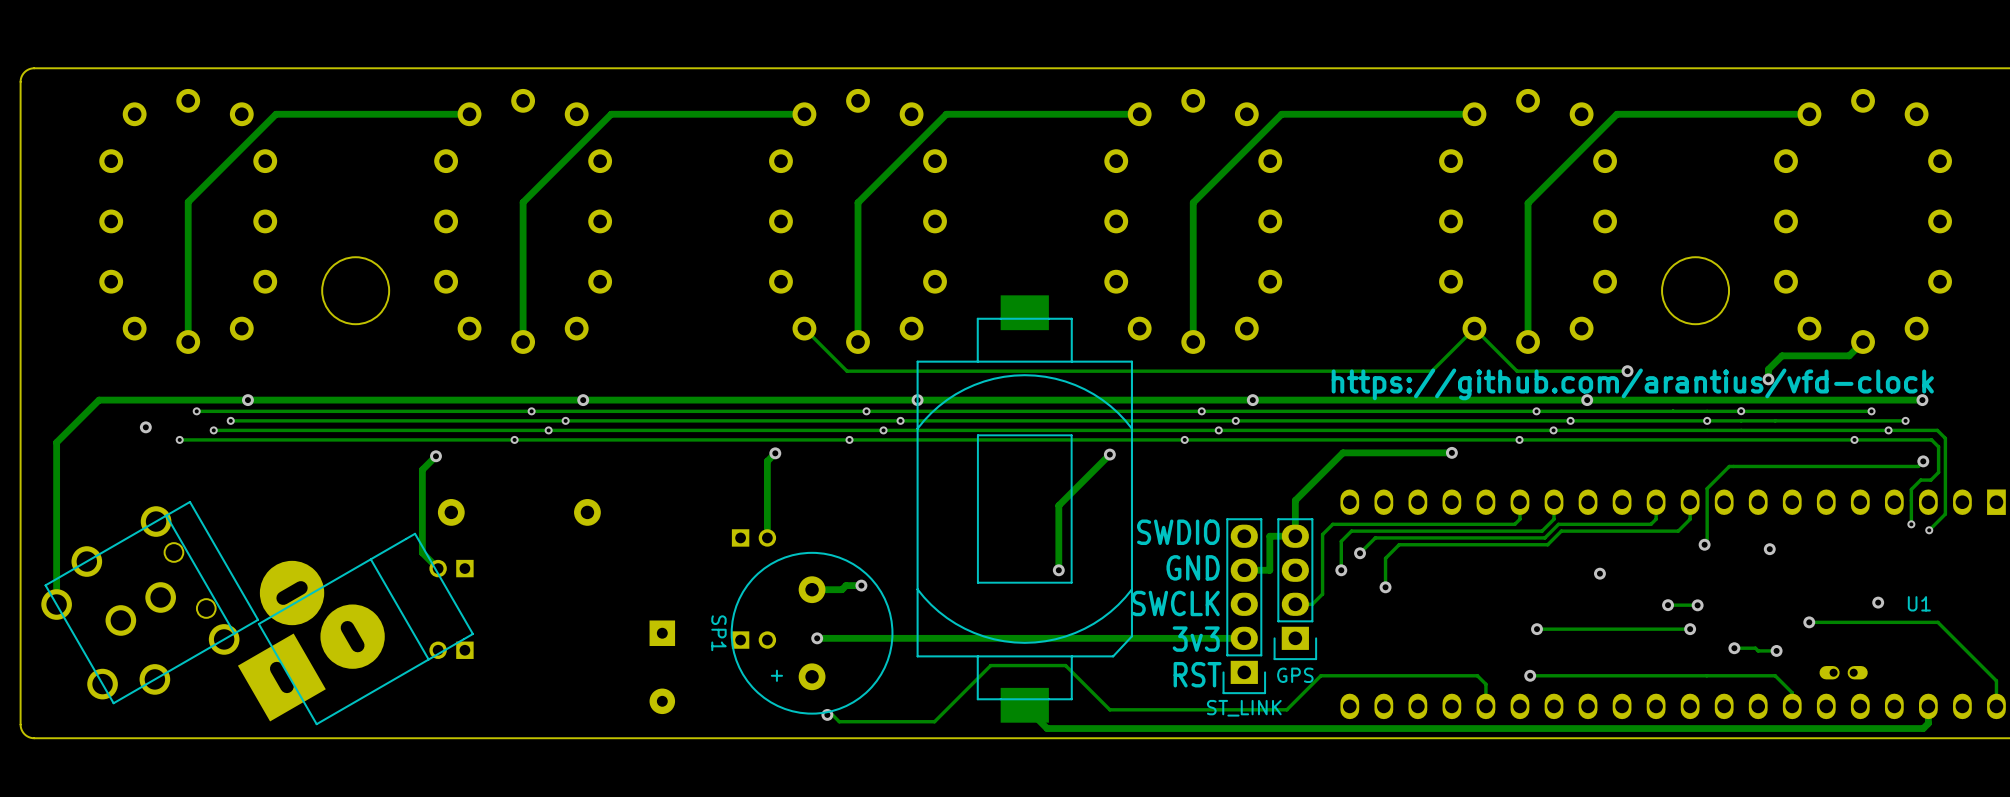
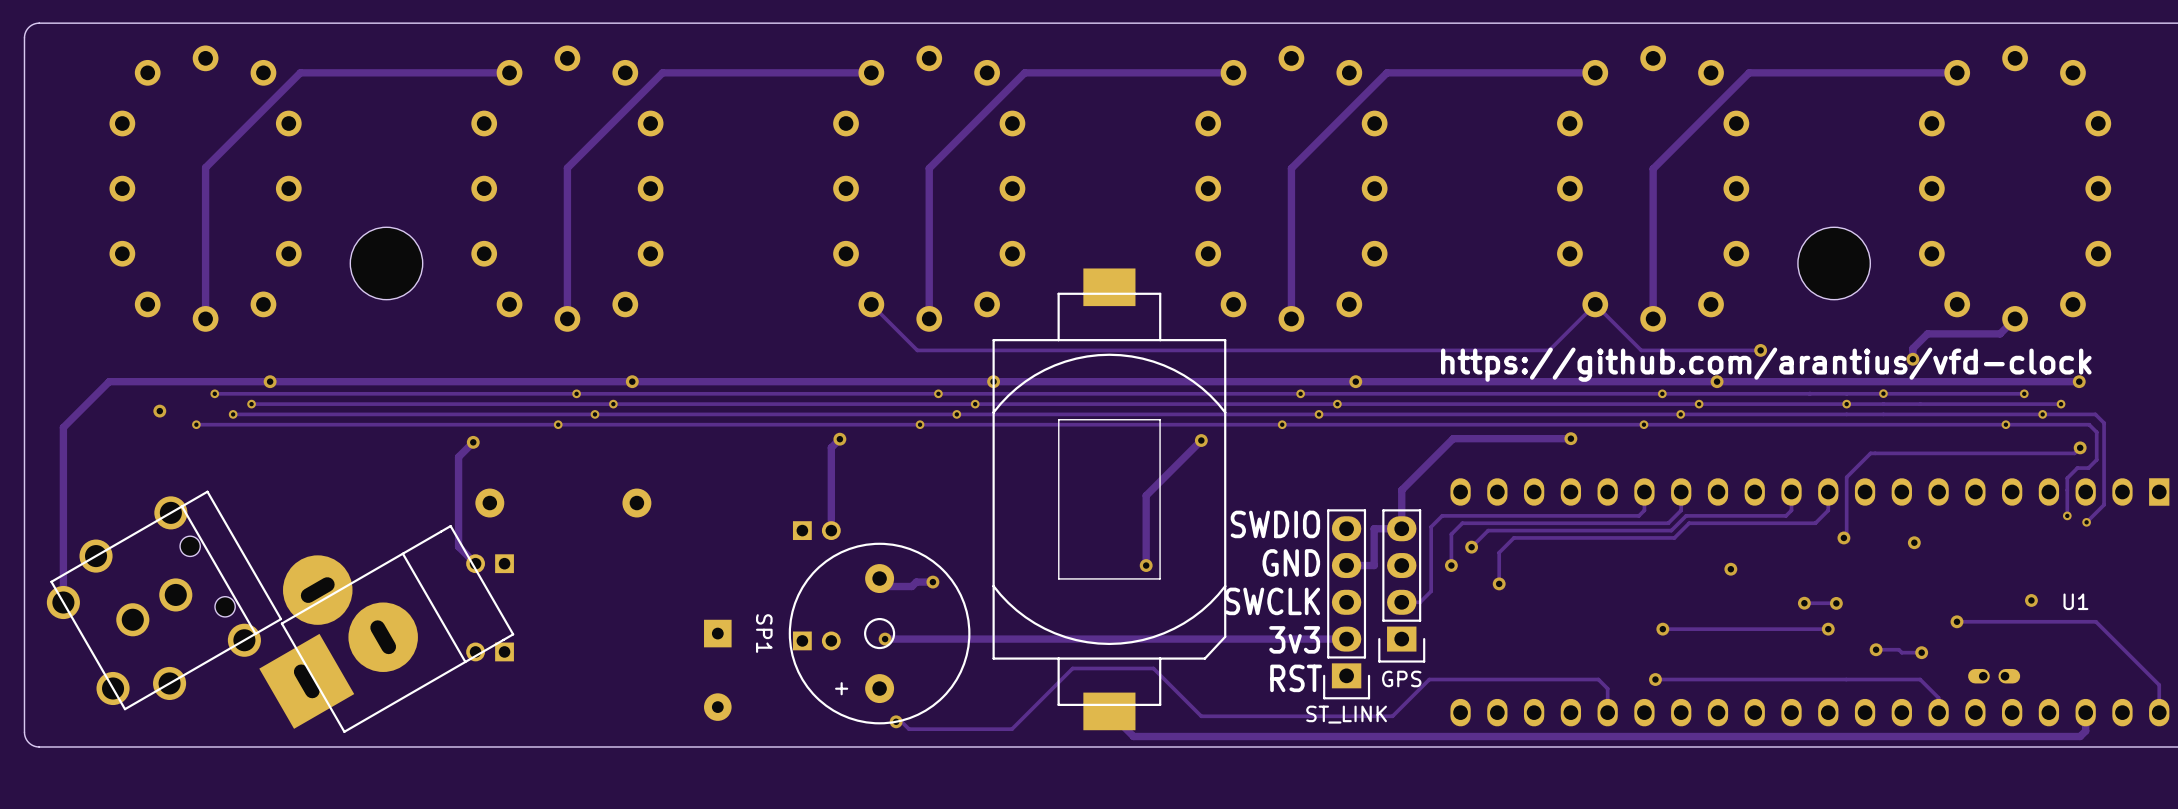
SP1 footprint: [730, 551, 894, 715] -> [788, 542, 971, 725]

